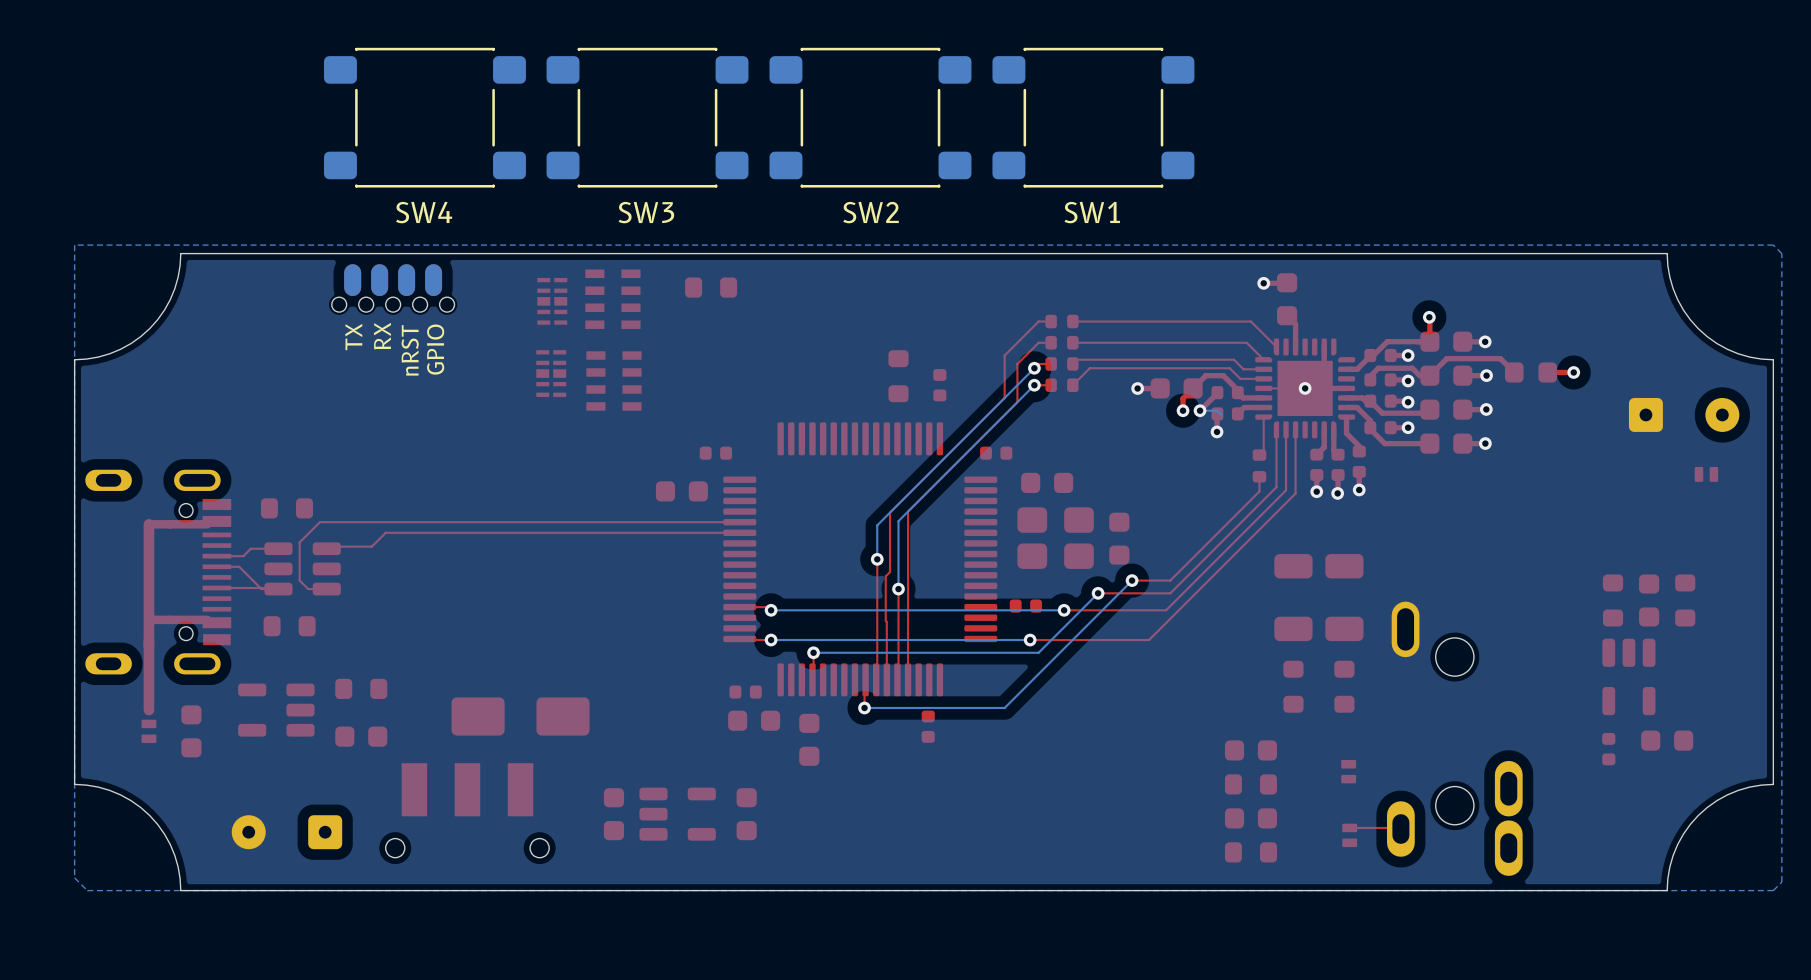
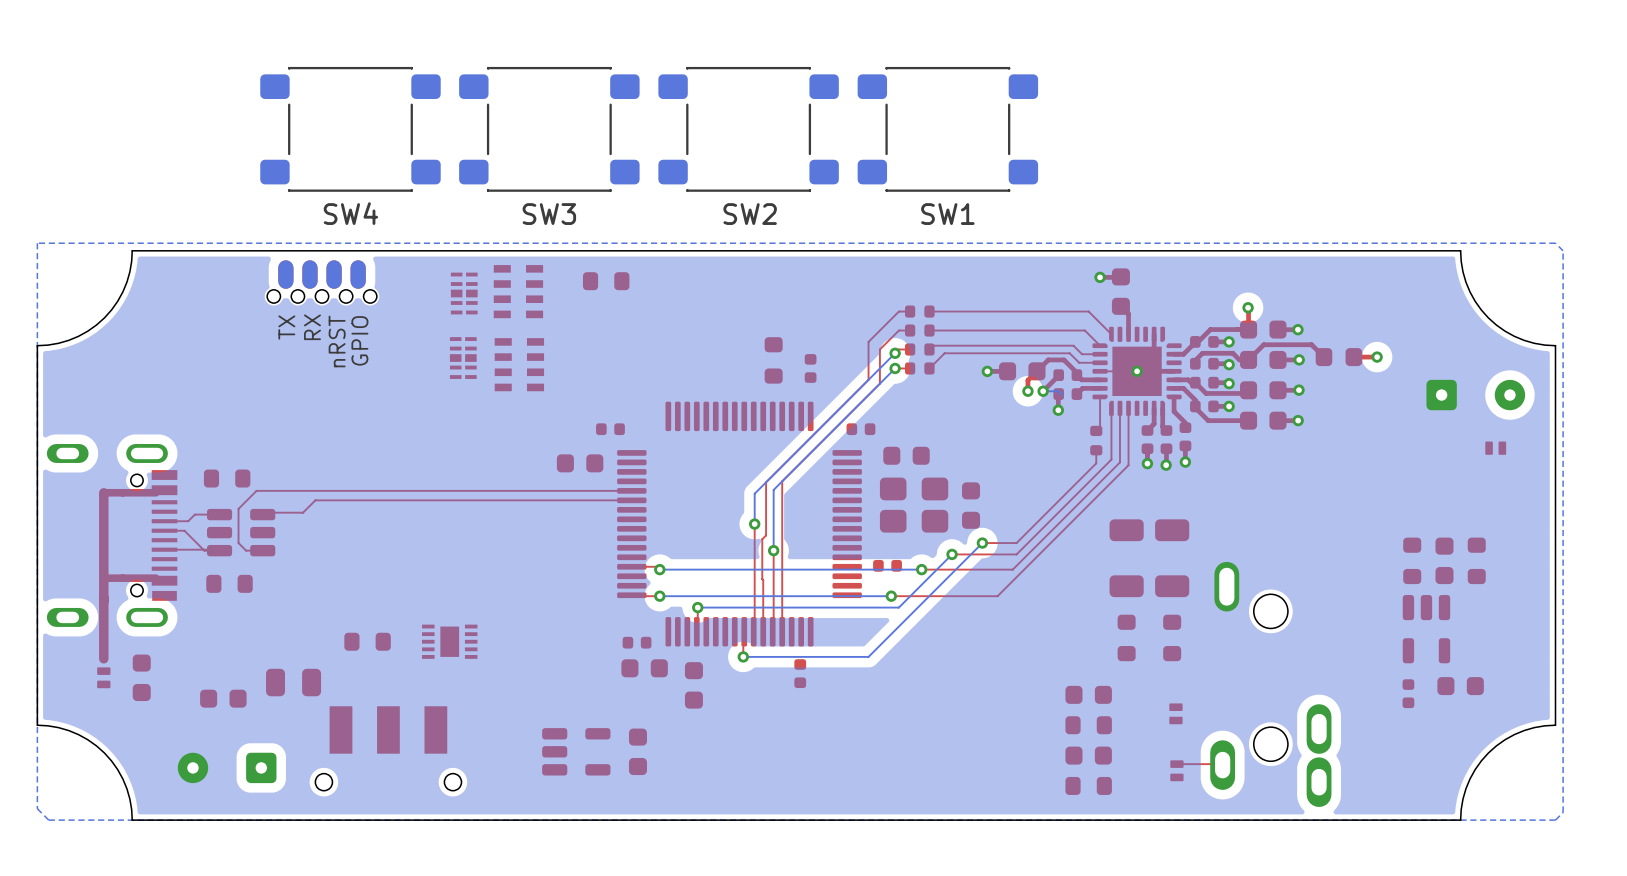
part position: (361, 688) -> (367, 641)
part: none -> (449, 641)
part: (276, 710) -> none
part: (520, 716) -> none
part footprint: [335, 726, 388, 747] -> [266, 668, 322, 697]
part rotation: 0° (613, 814) -> 90° clockwise (223, 698)
part position: (613, 814) -> (223, 698)

